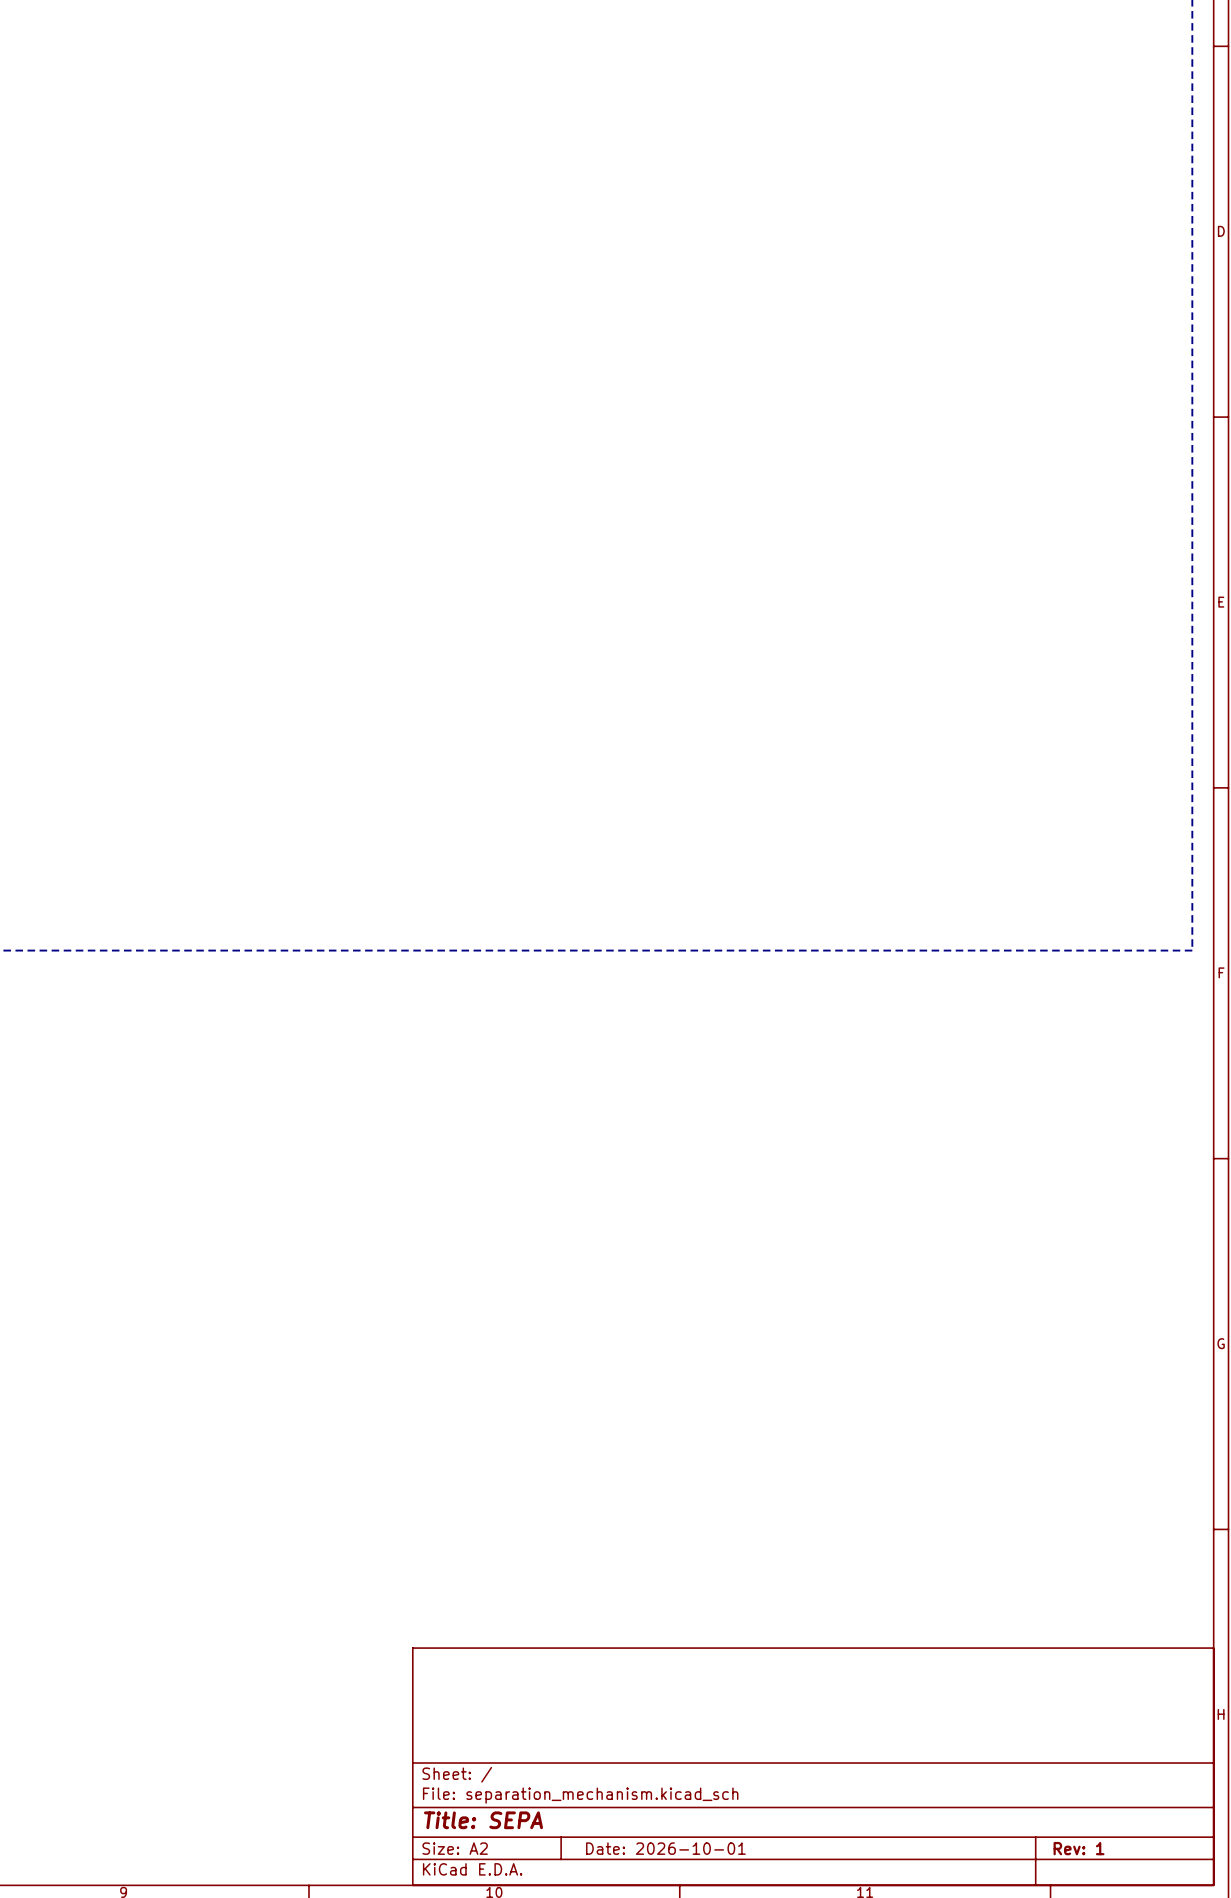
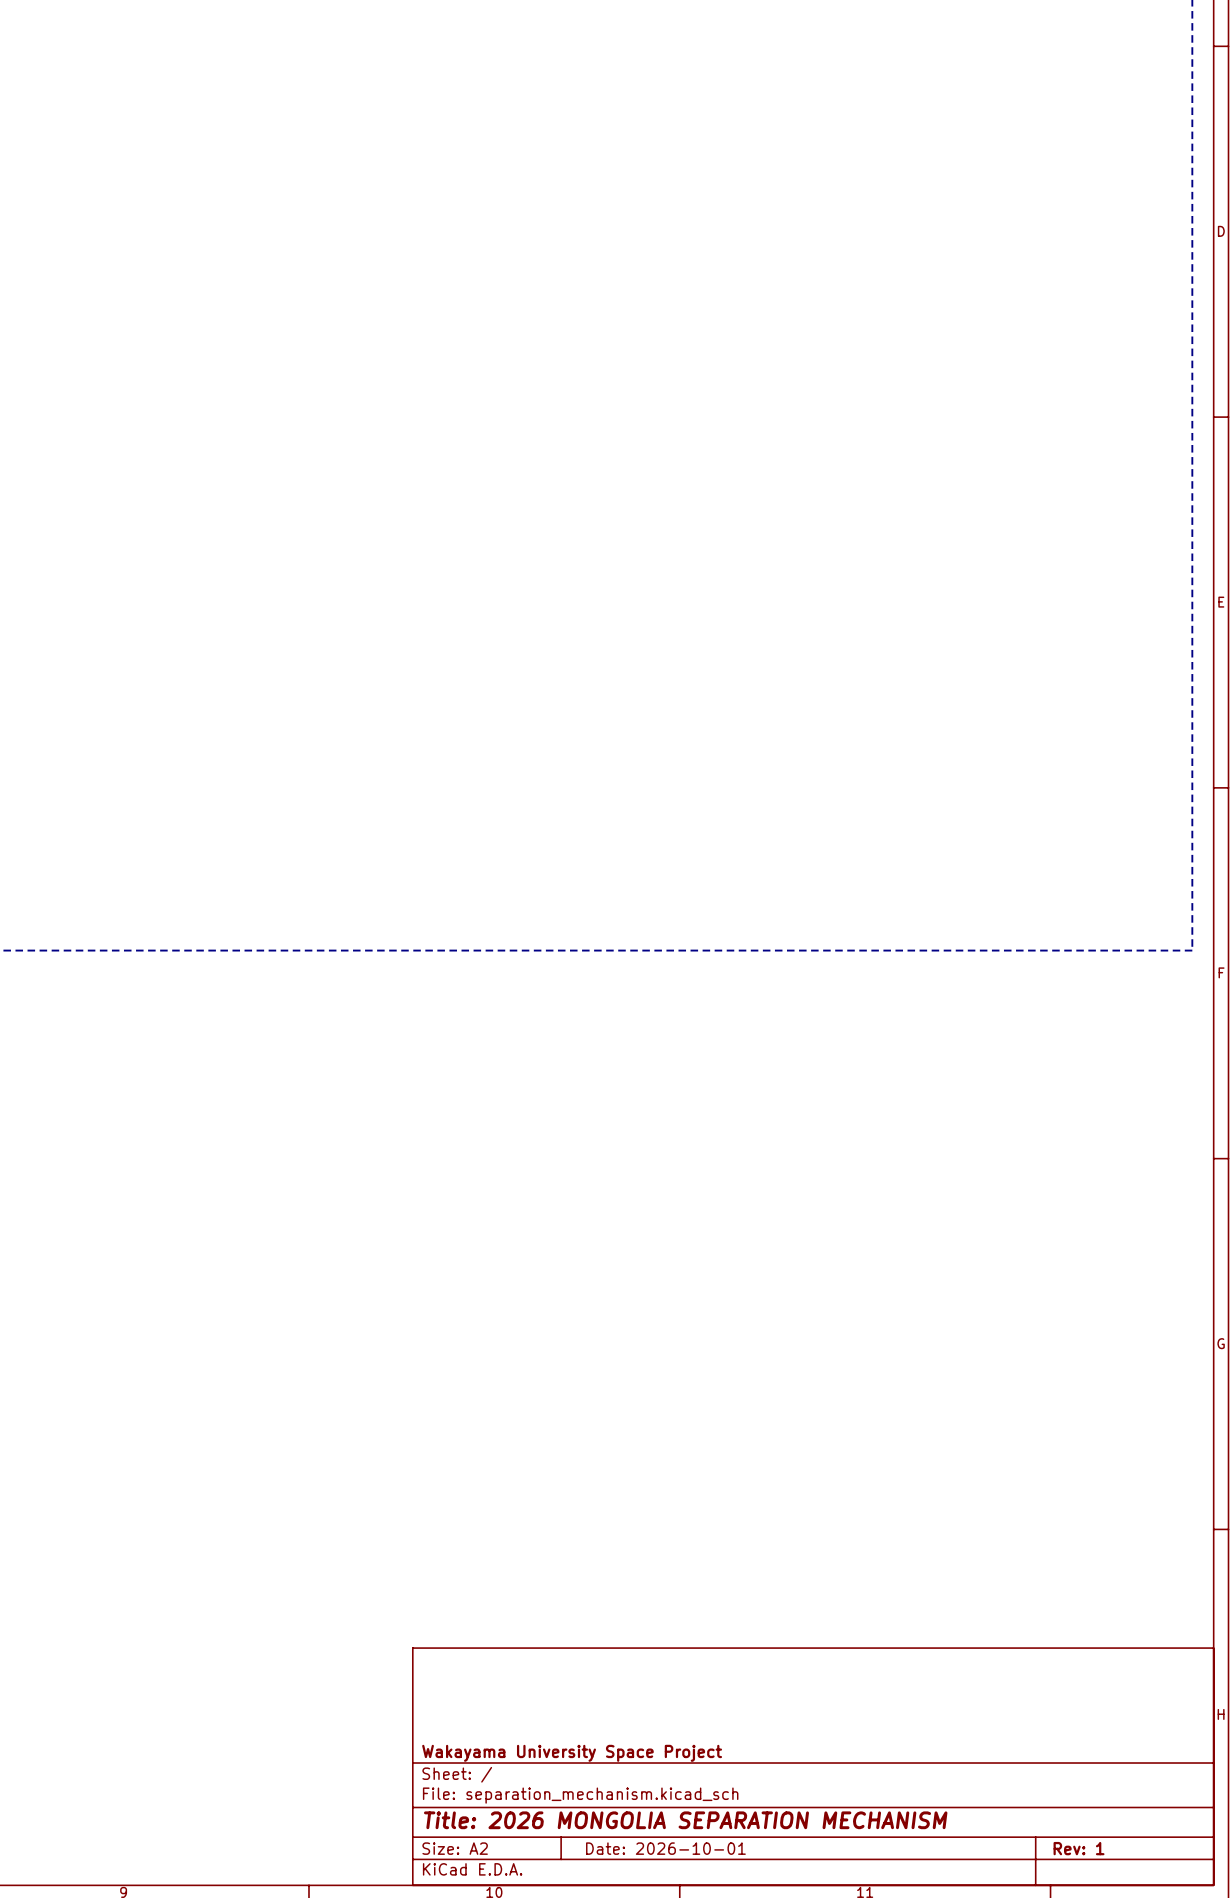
title block: none -> Wakayama University Space Project (572, 1753)
title block: Title: SEPA (483, 1820) -> Title: 2026 MONGOLIA SEPARATION MECHANISM (685, 1820)

